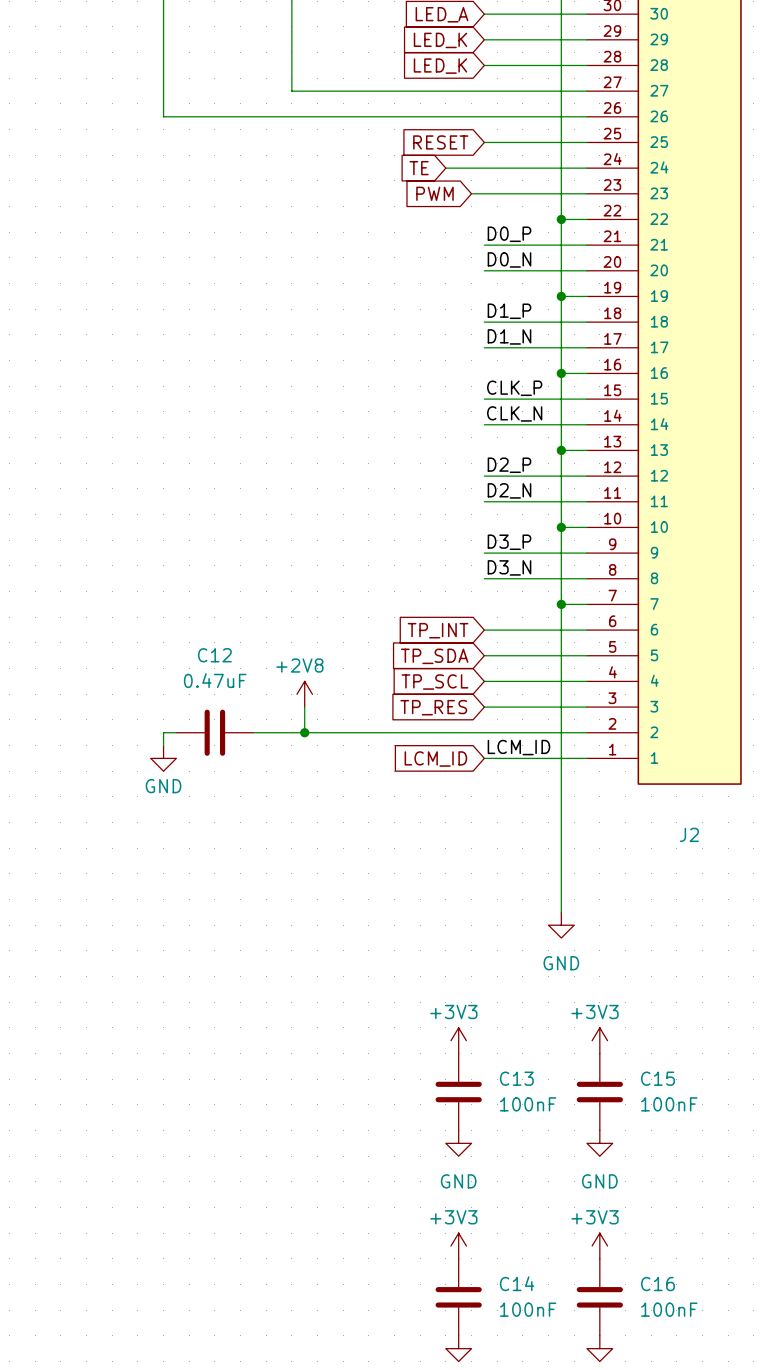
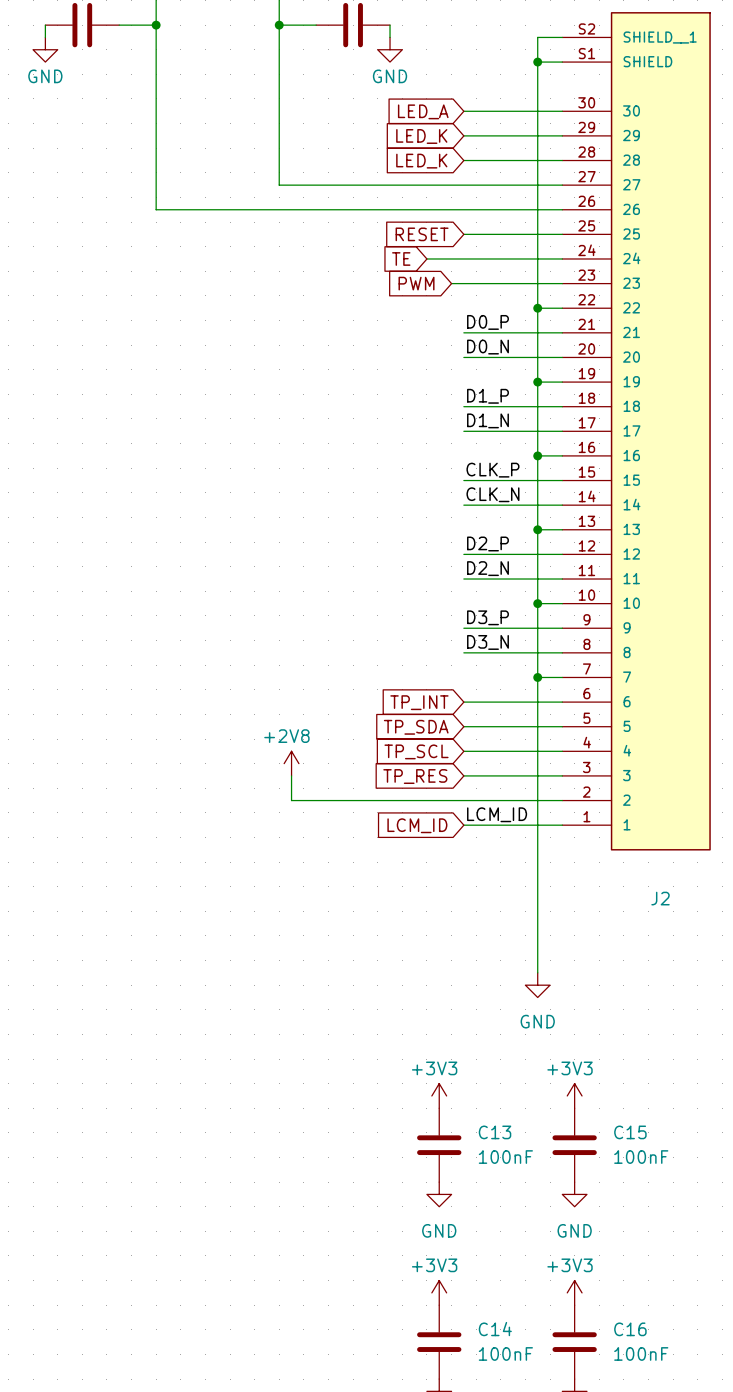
wire: (176, 732) (163, 732) (163, 745) -> none
C12: 0.47uF (214, 732) -> none
wire: (253, 732) (304, 732) -> none
junction: (304, 732) -> none
power symbol: GND (163, 758) -> none

